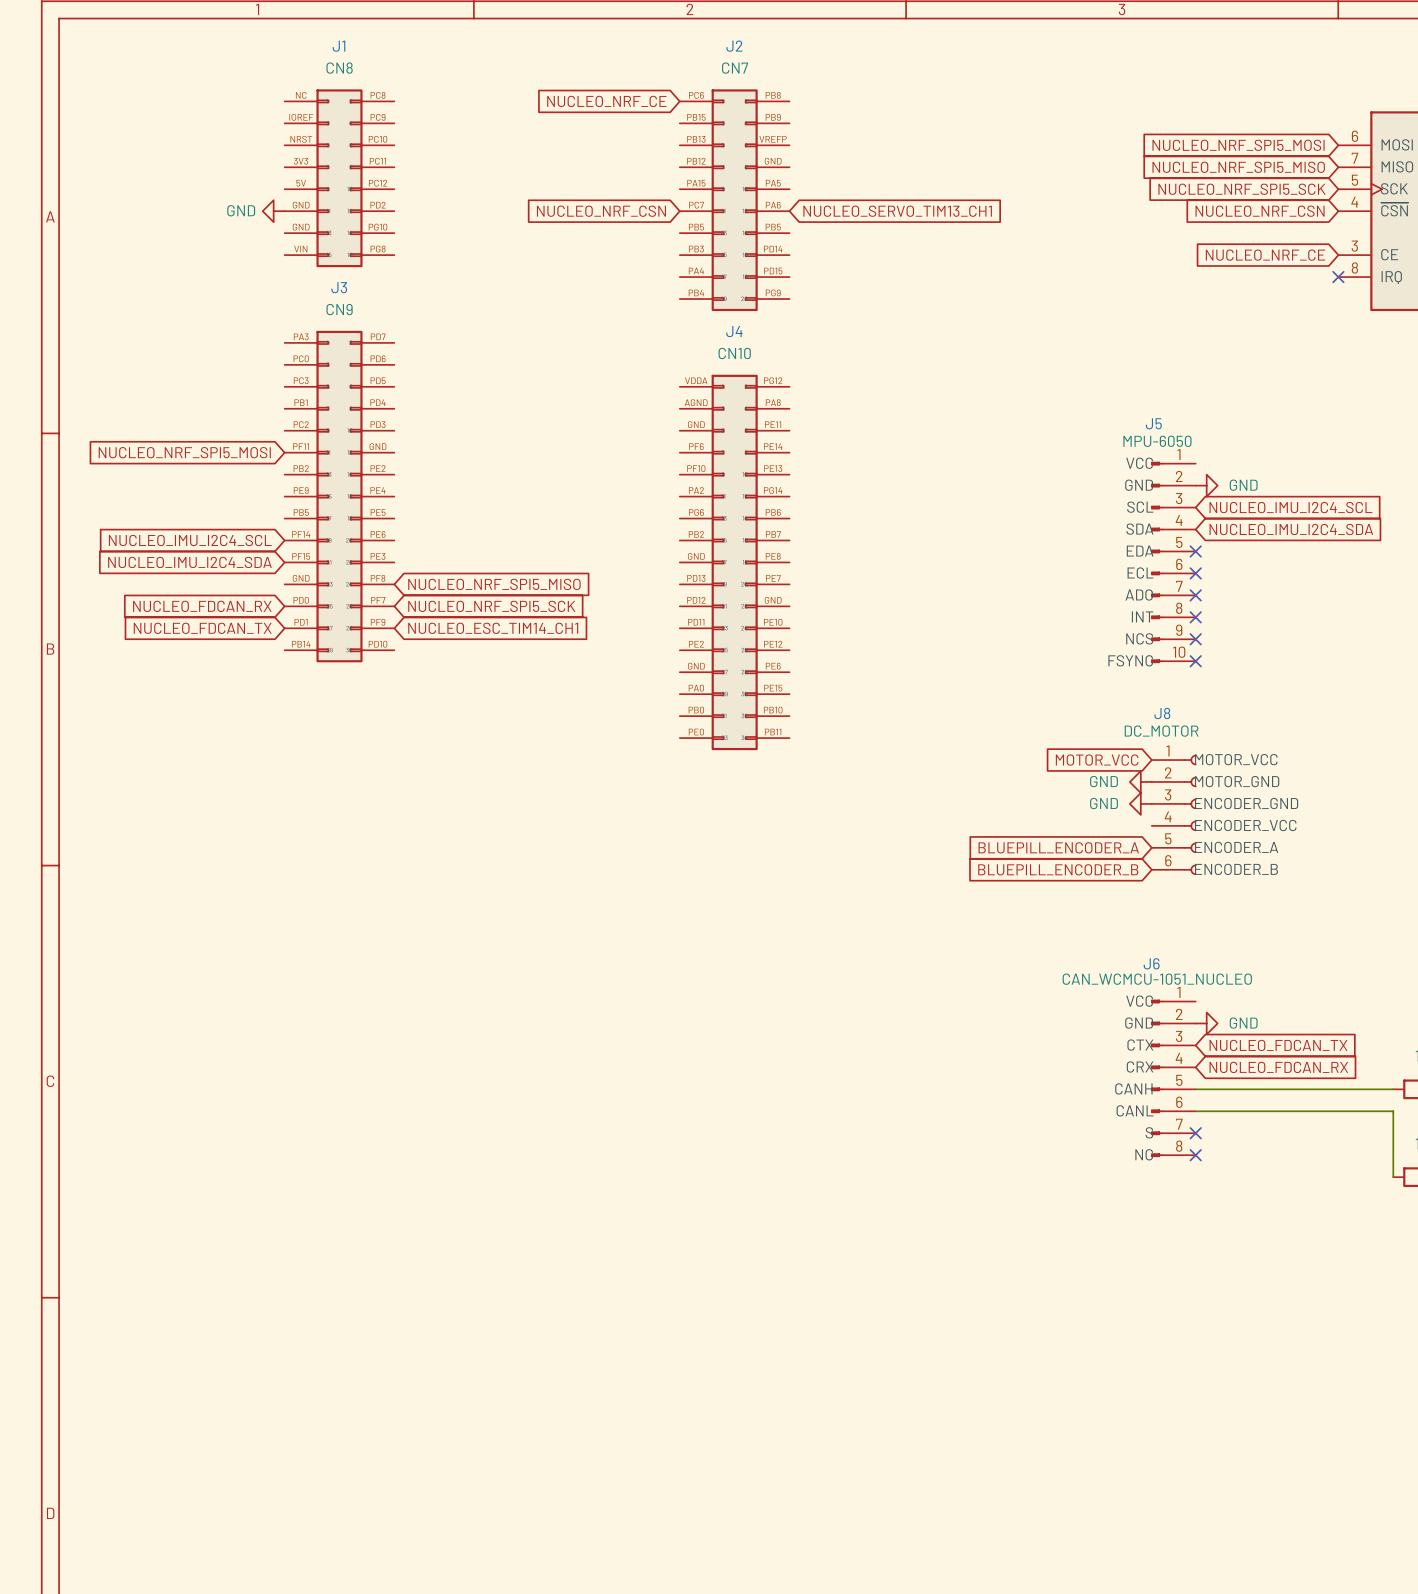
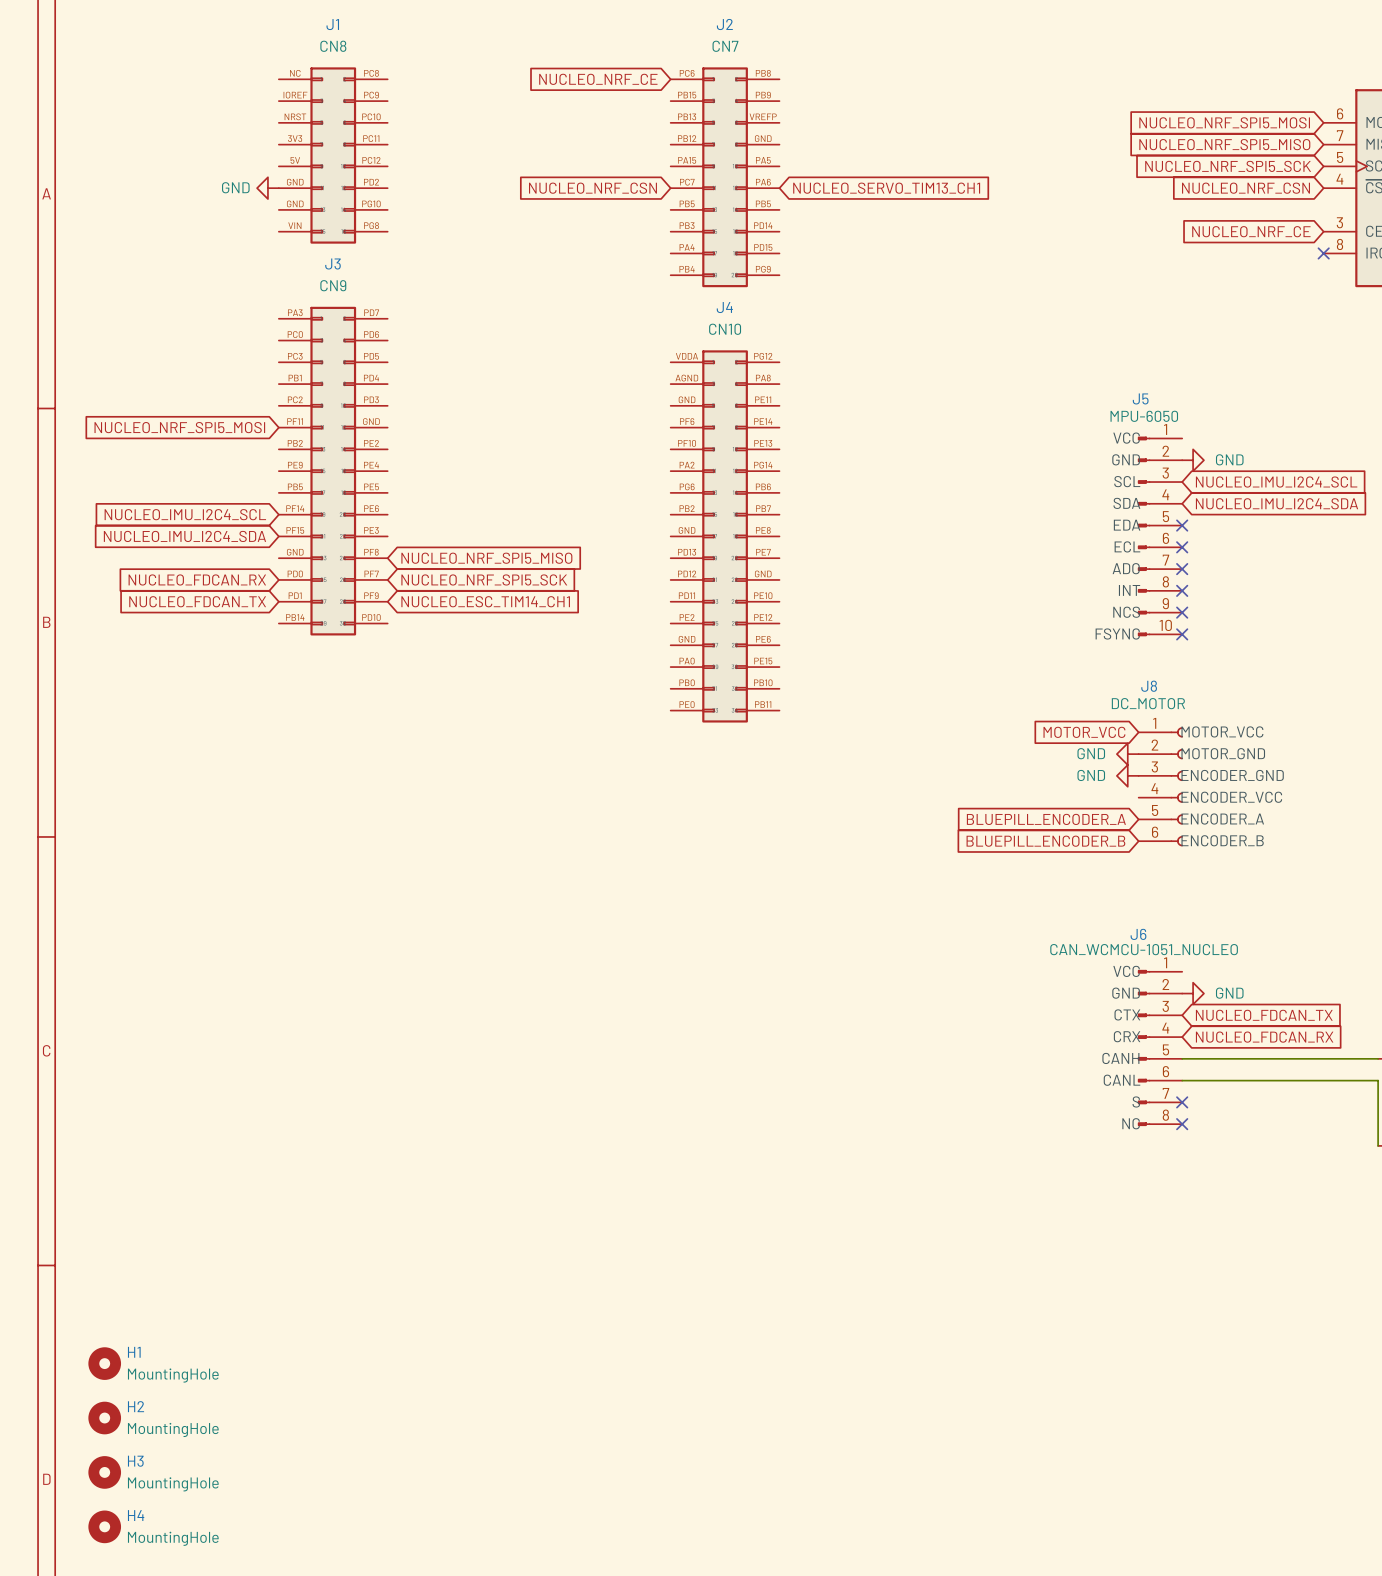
H1: none -> MountingHole (104, 1363)
H2: none -> MountingHole (104, 1418)
H3: none -> MountingHole (104, 1472)
H4: none -> MountingHole (104, 1526)

